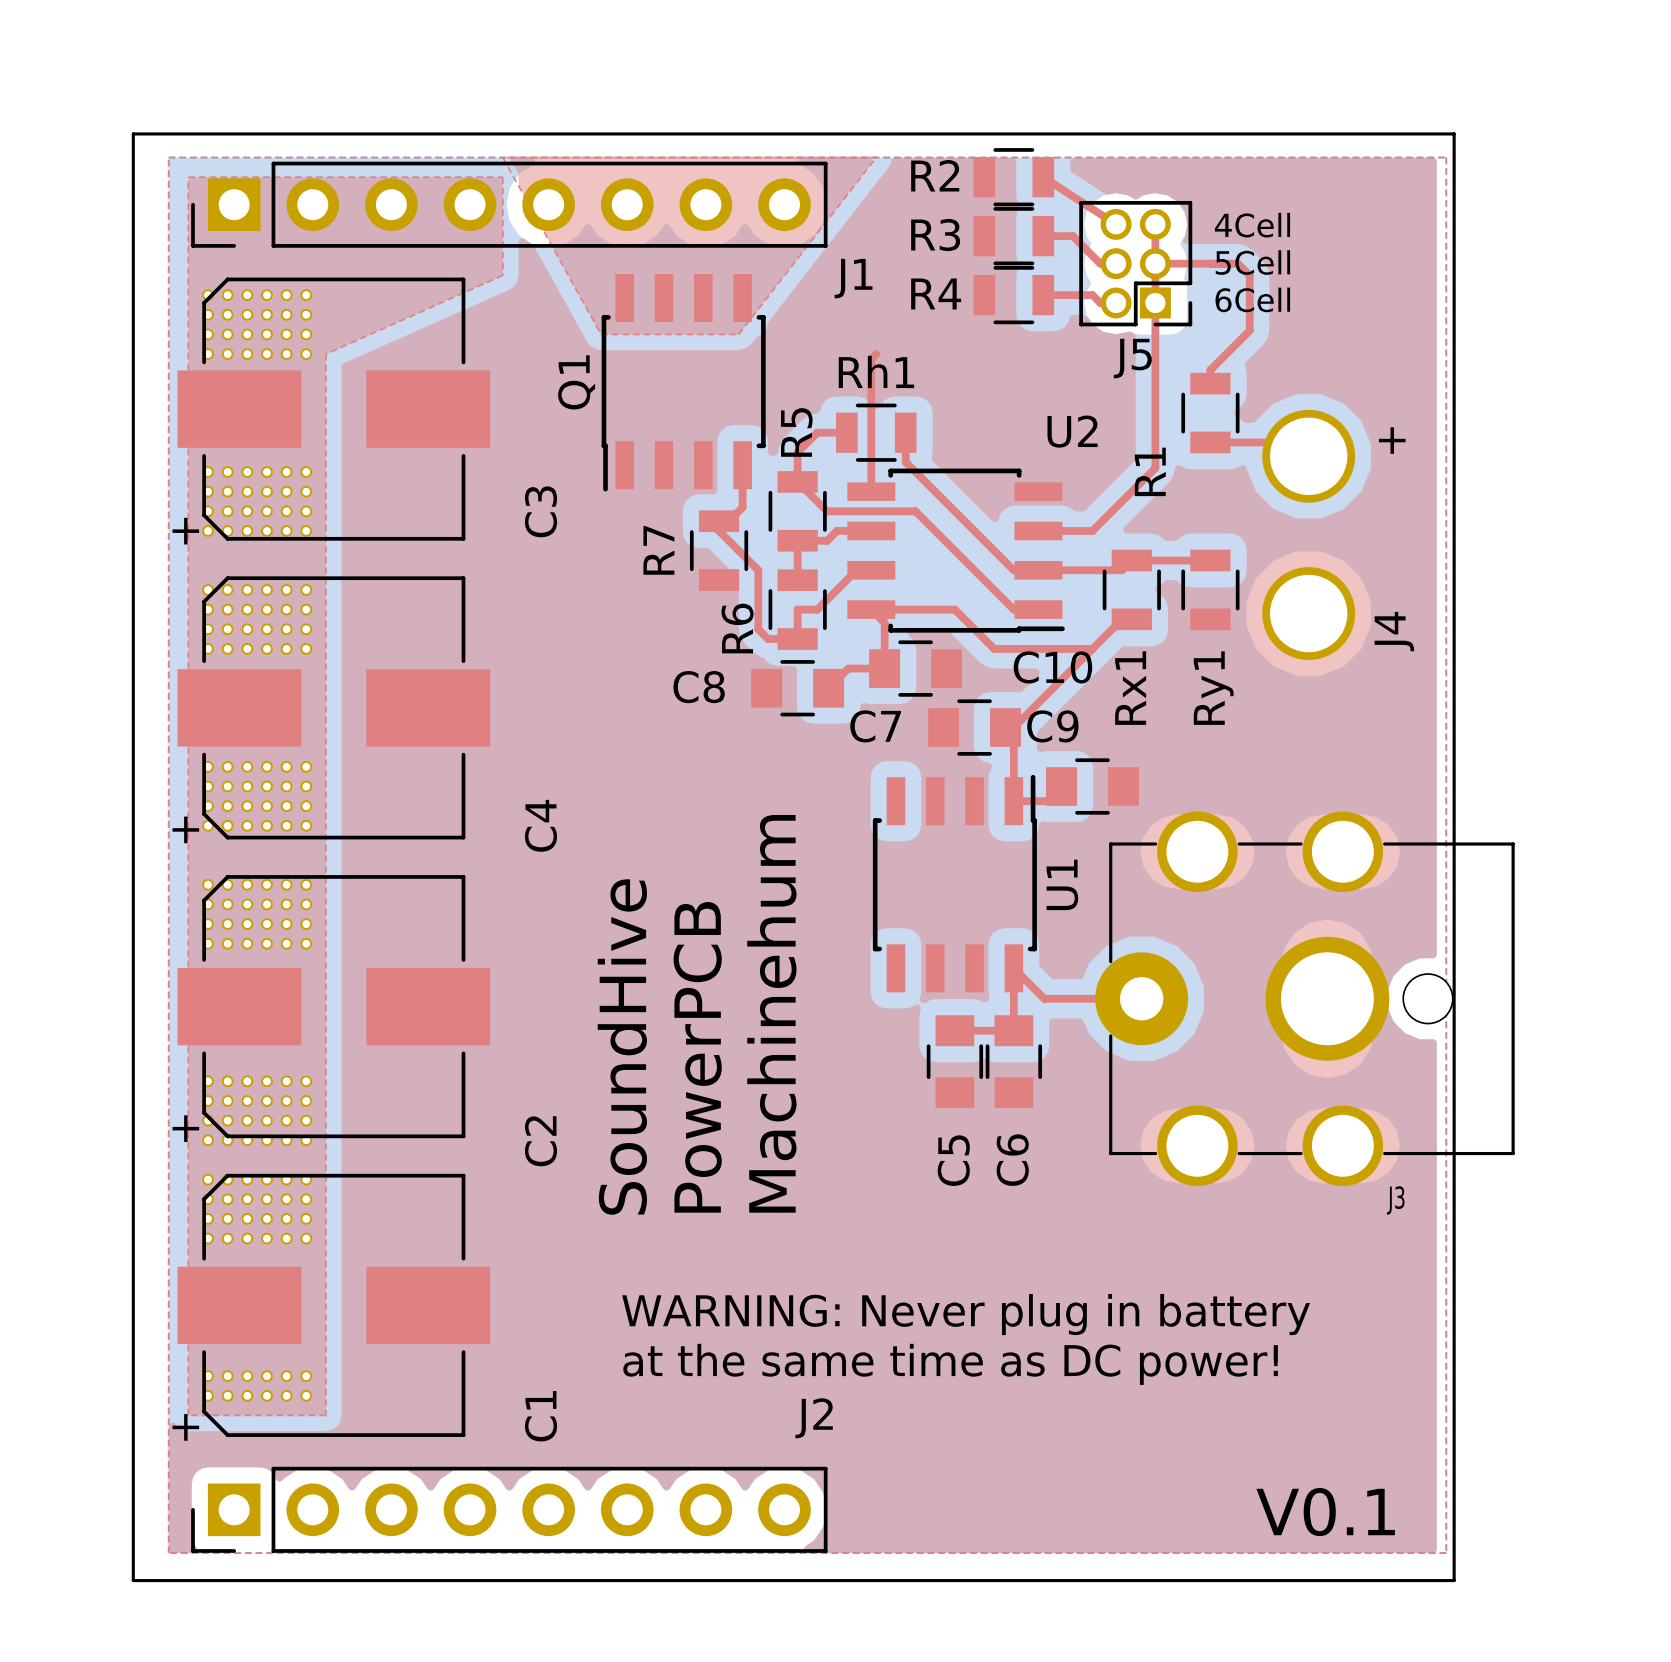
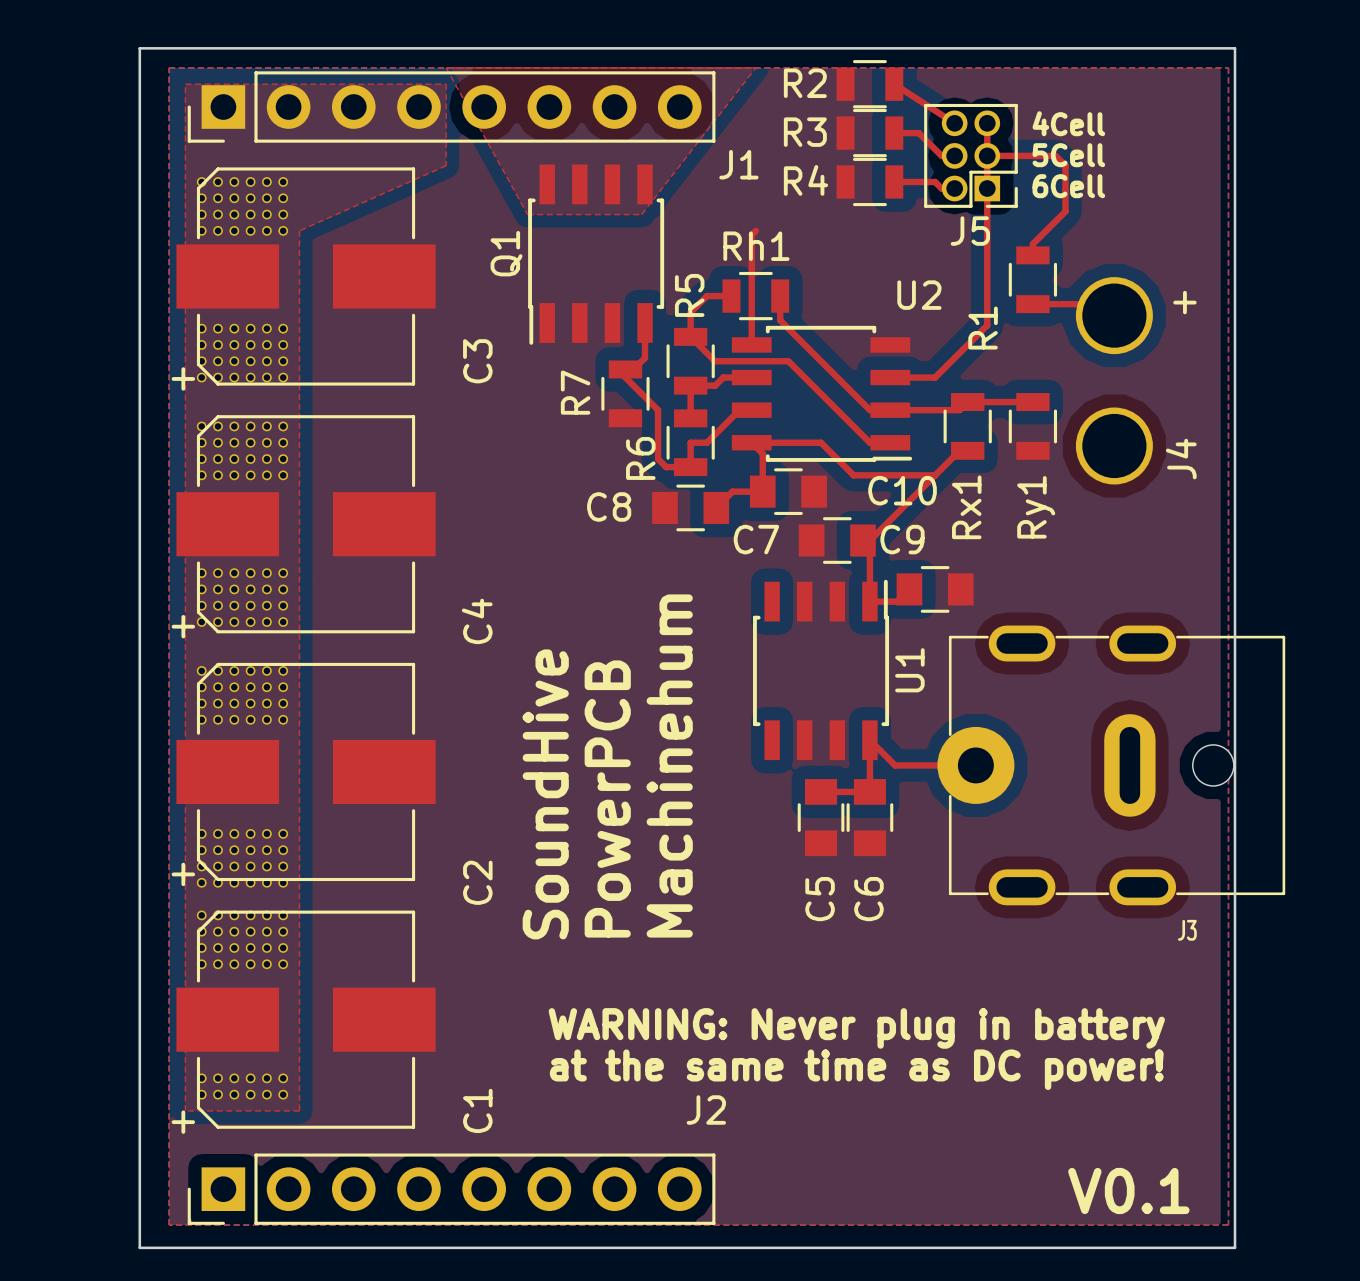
J3 footprint: [1095, 811, 1515, 1187] -> [937, 625, 1286, 906]

